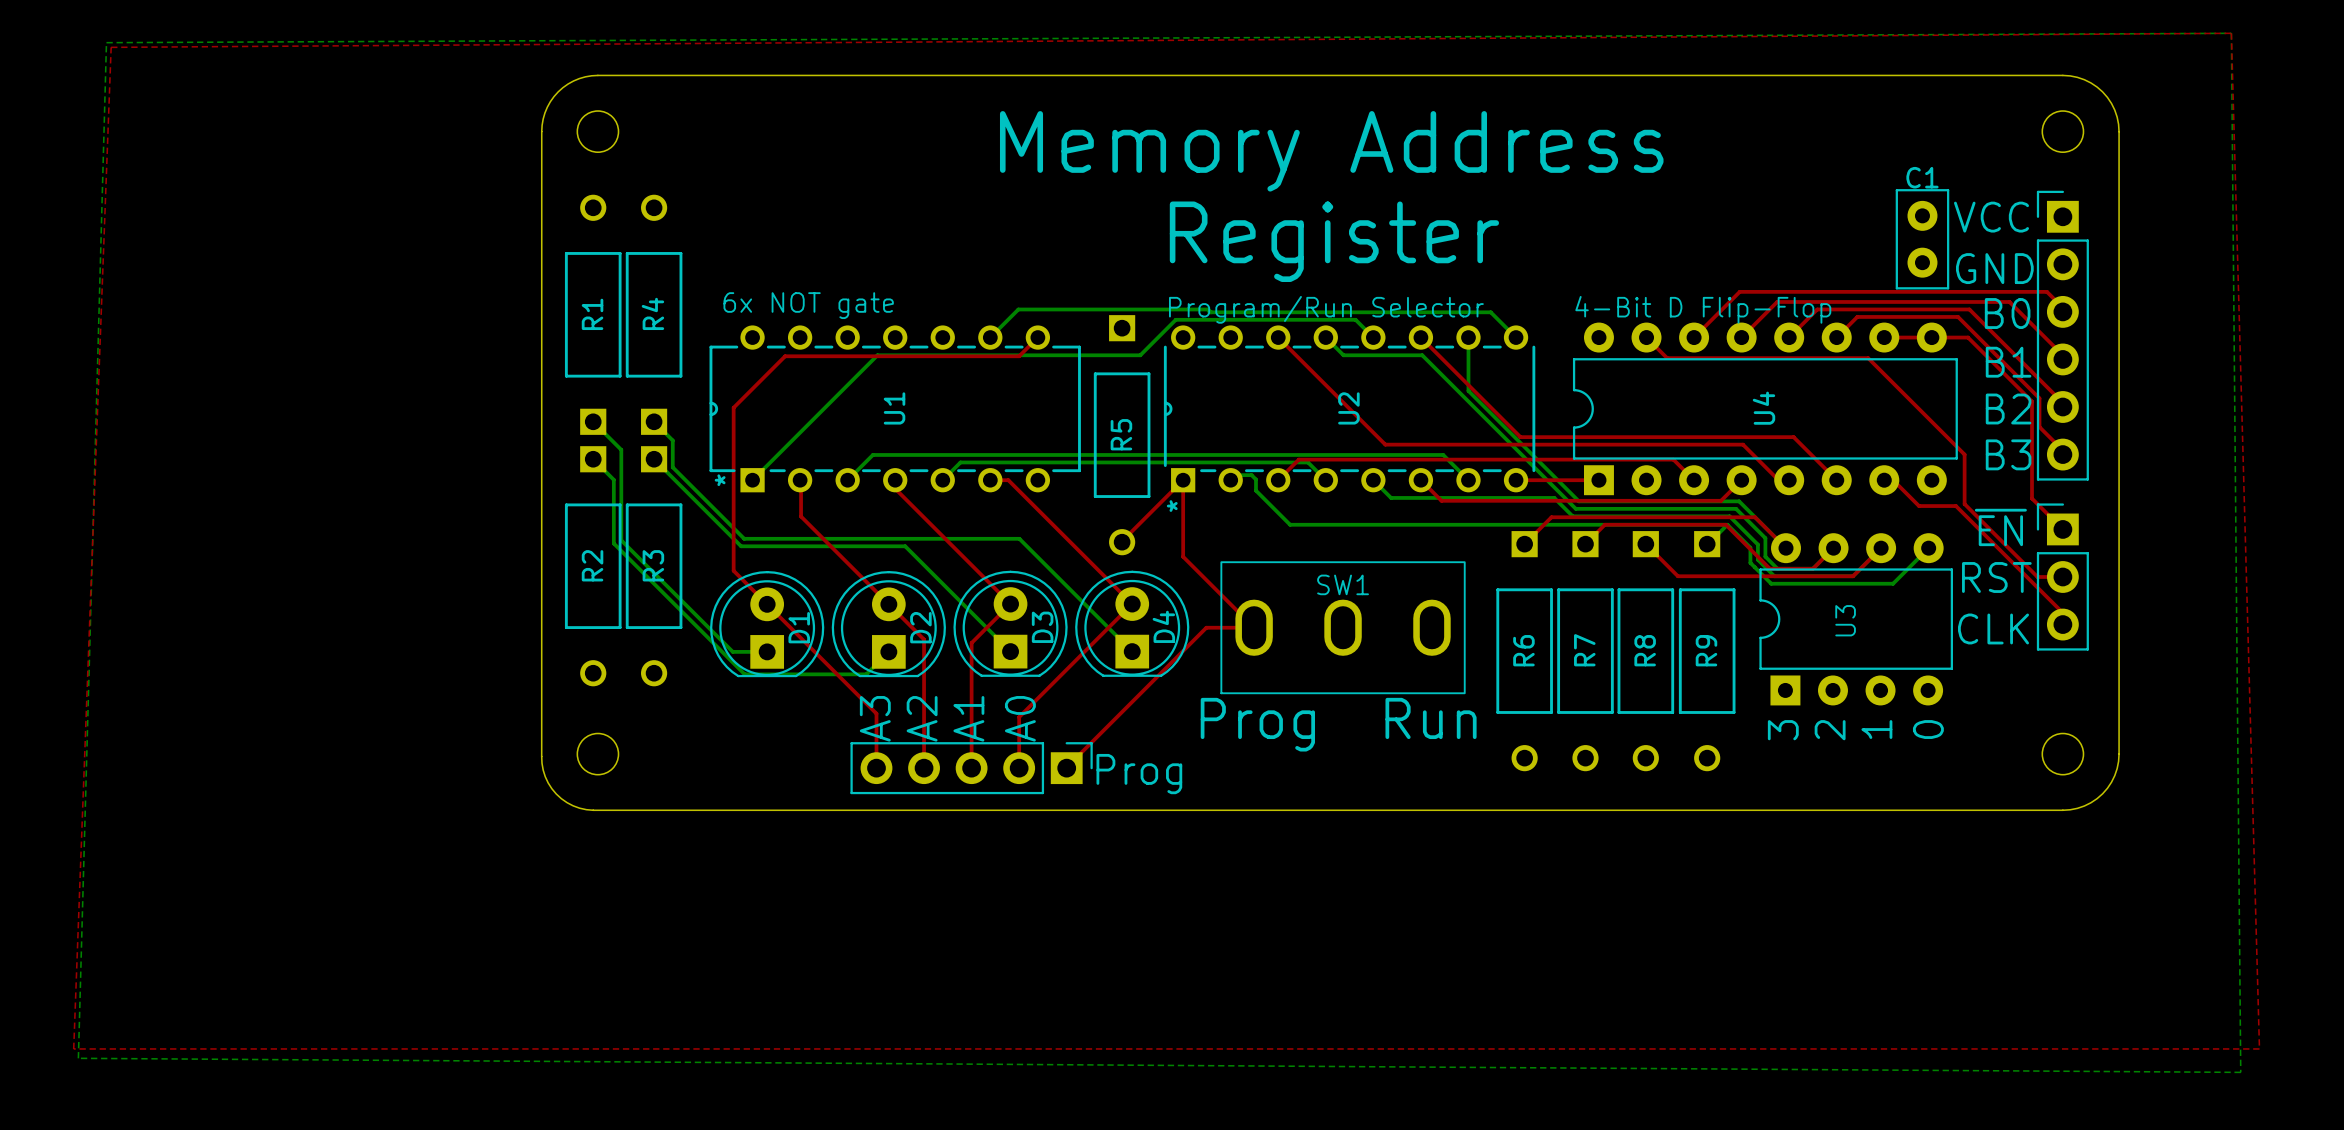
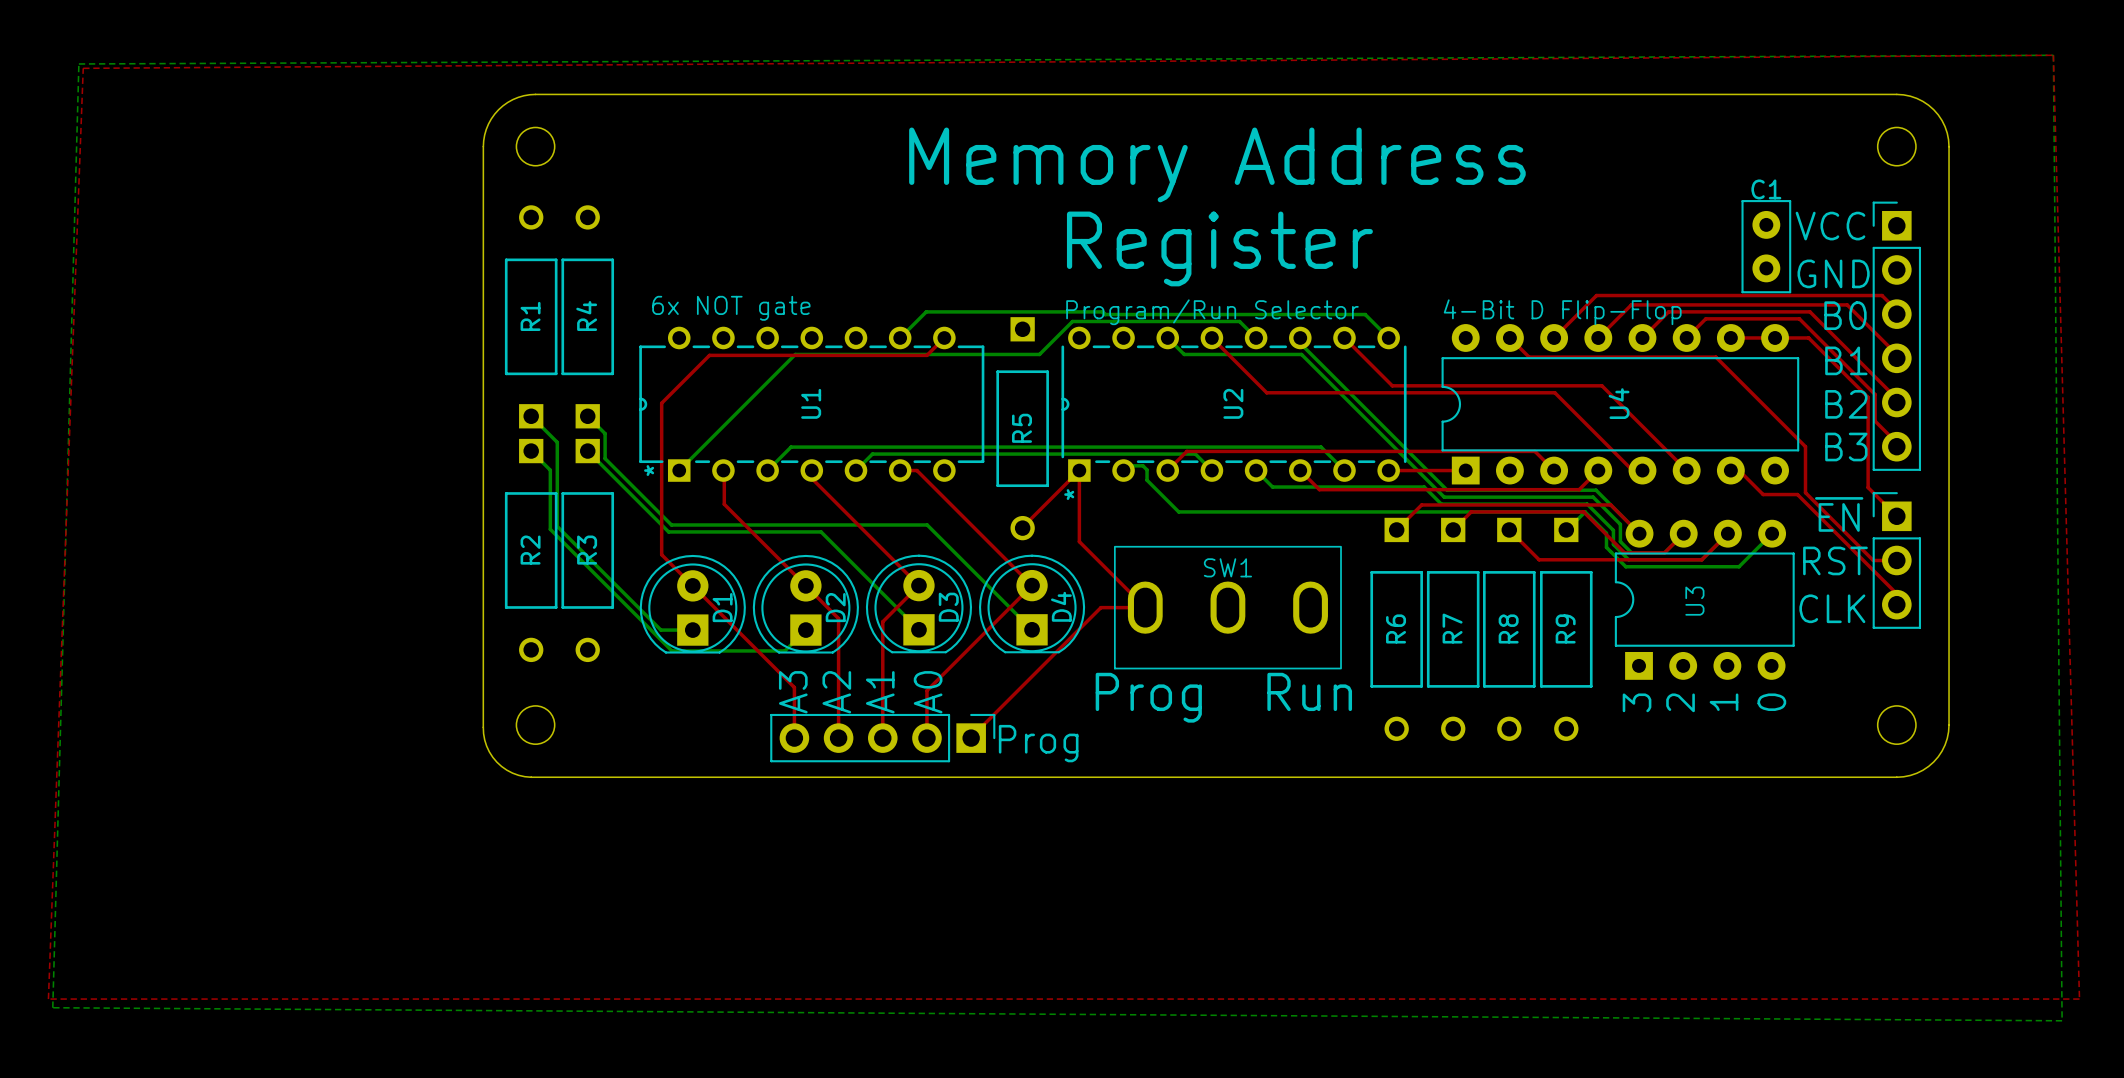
top track: (1278, 337) (1385, 444) (1743, 444) -> (1211, 337) (1266, 392) (1554, 392) (1599, 437)
bottom track: (1325, 337) (1343, 355) -> (1167, 337) (1184, 354) (1228, 354)
top track: (1420, 337) (1520, 437) (1793, 437) -> (1344, 337) (1392, 385) (1601, 385) (1646, 430)
bottom track: (1468, 337) (1468, 390) -> (1300, 337) (1300, 343) (1344, 387)

